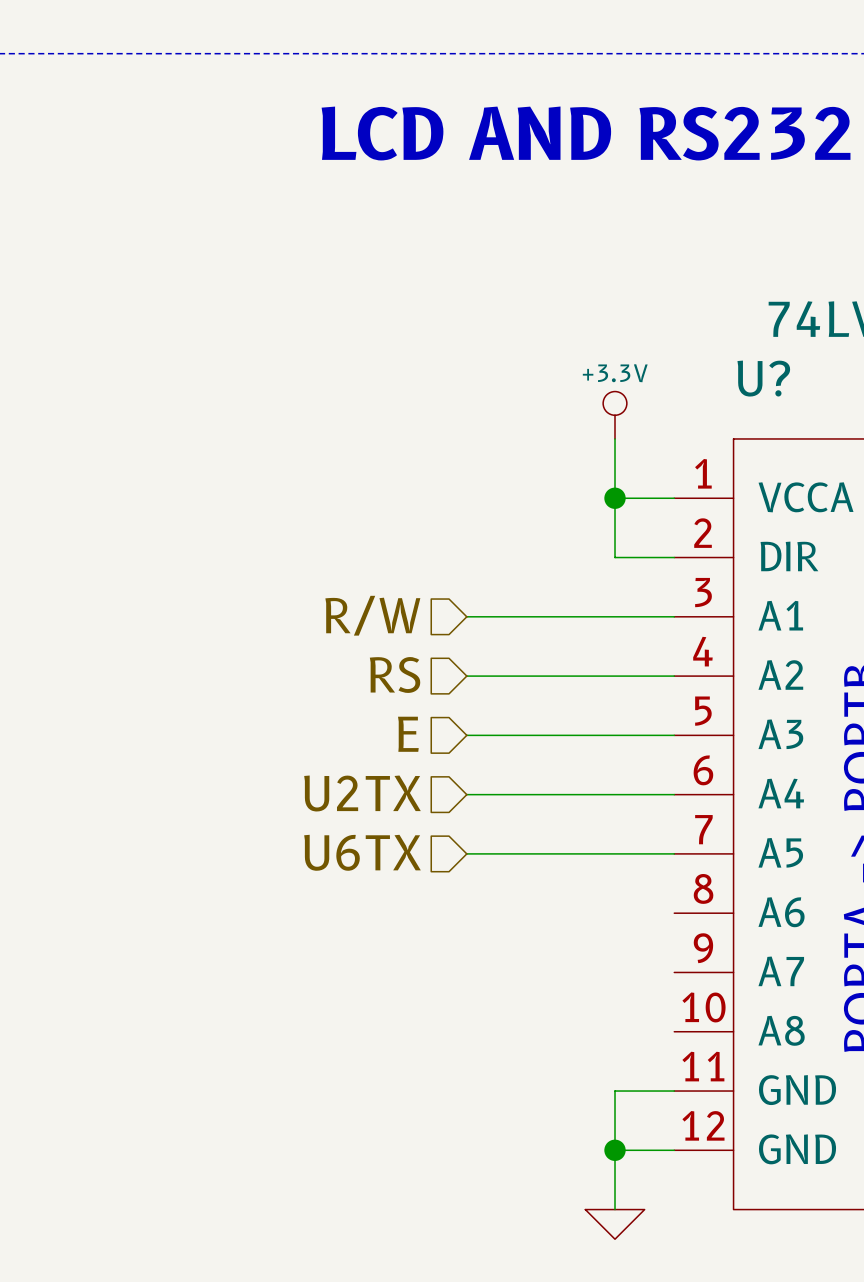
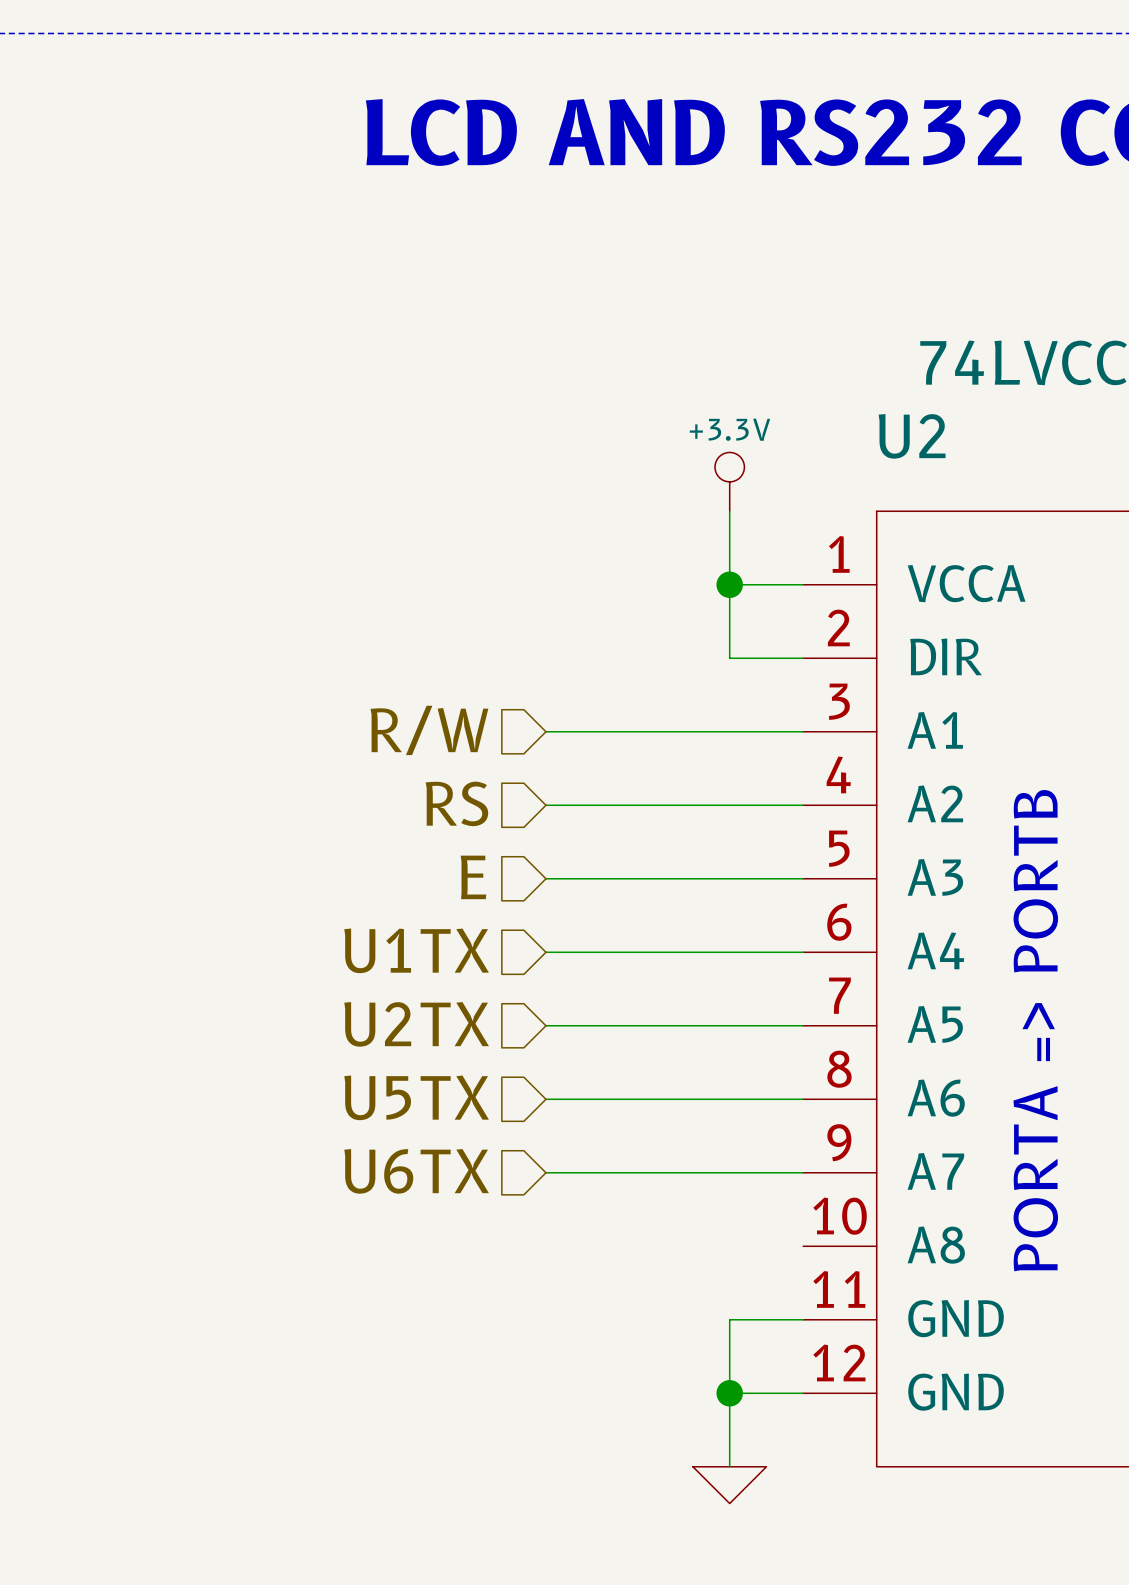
U? name: U? (763, 378) -> U2 (912, 436)
hierarchical label: U2TX (362, 793) -> U1TX (416, 950)
hierarchical label: U6TX (362, 852) -> U2TX (416, 1024)
hierarchical label: none -> U5TX (416, 1097)
wire: none -> (545, 1099) (803, 1099)
hierarchical label: none -> U6TX (416, 1171)
wire: none -> (545, 1172) (803, 1172)

